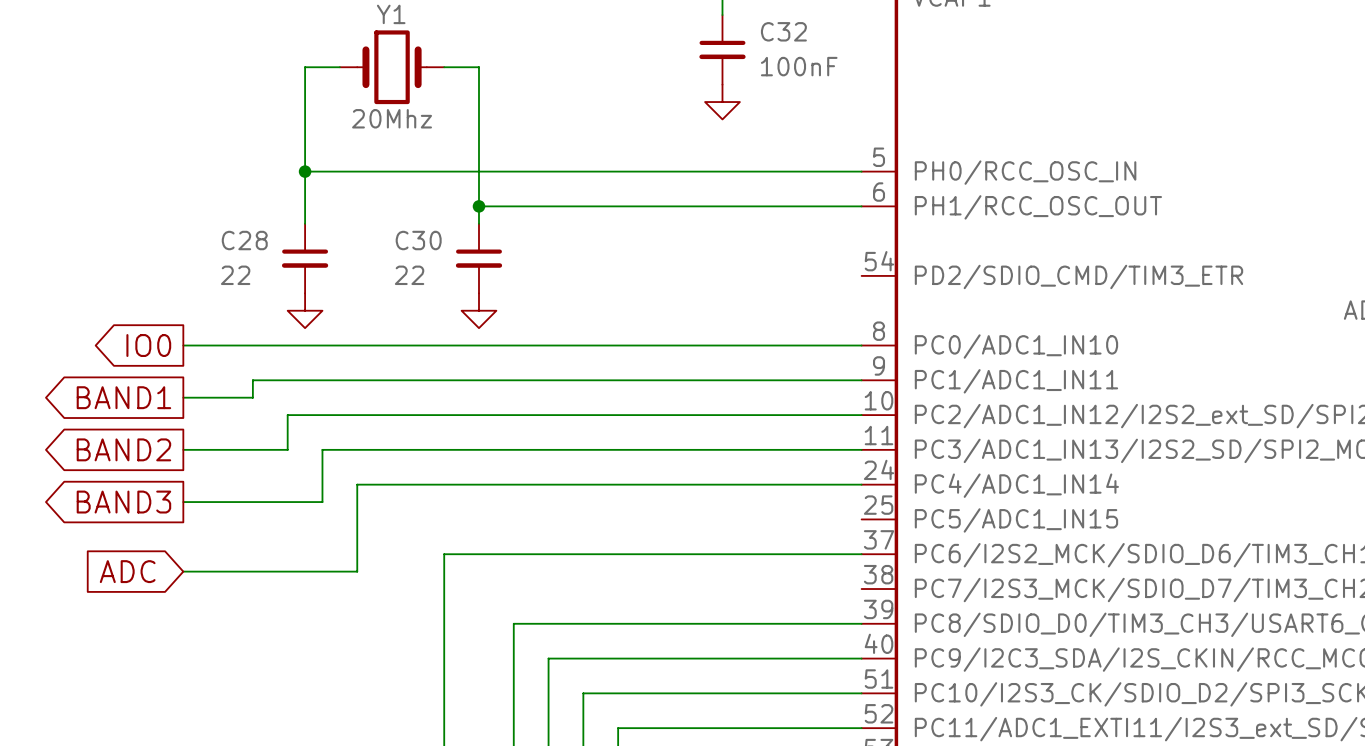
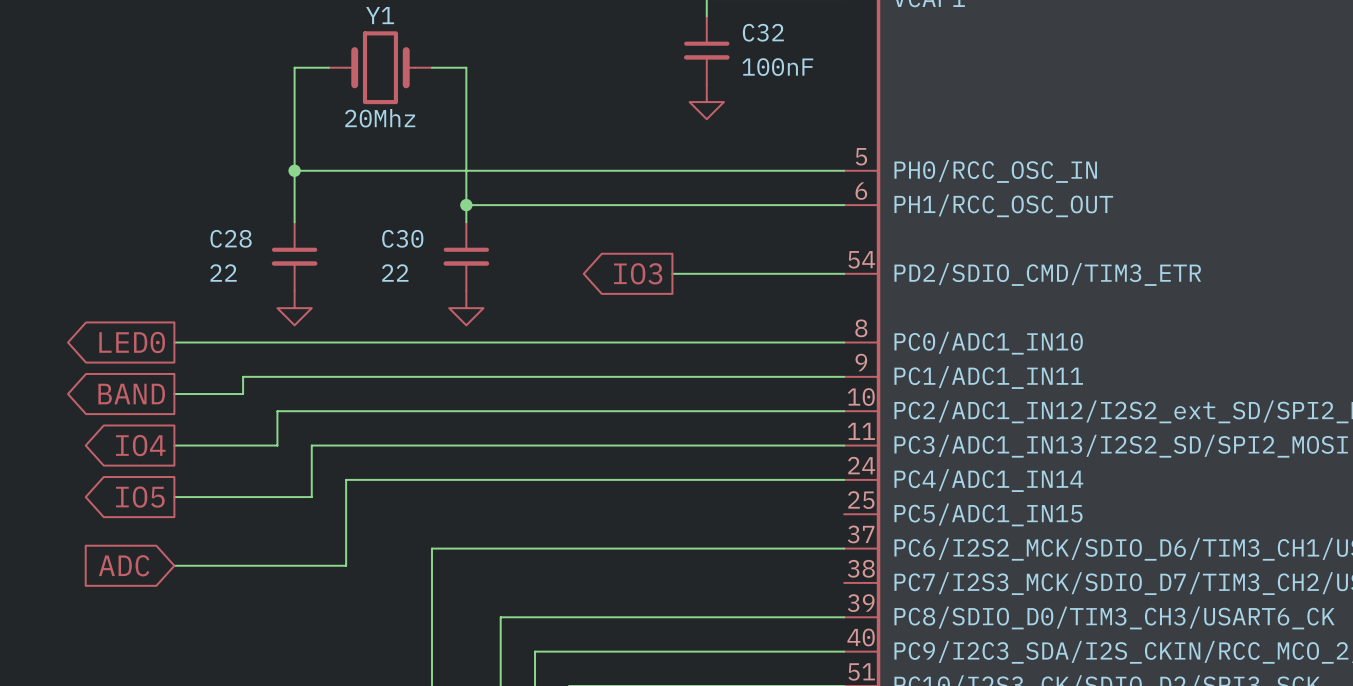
global label: none -> IO3 (638, 273)
wire: none -> (672, 273) (844, 273)
global label: IO0 (148, 345) -> LED0 (132, 342)
global label: BAND1 (123, 397) -> BAND (131, 394)
global label: BAND2 (123, 449) -> IO4 (140, 445)
global label: BAND3 (123, 502) -> IO5 (140, 497)

